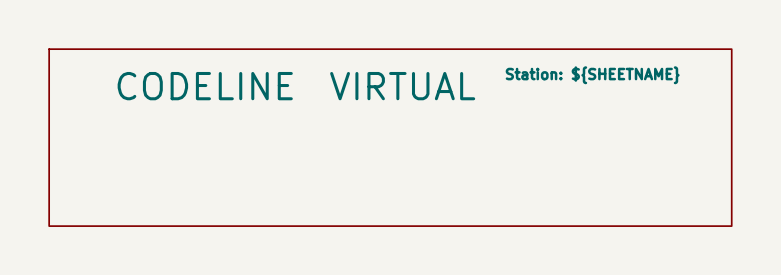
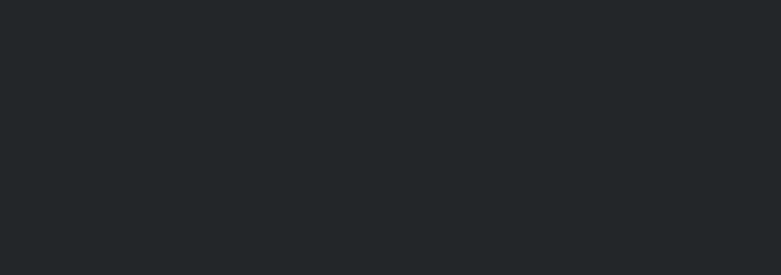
part: VIRTUAL (390, 137) -> none

